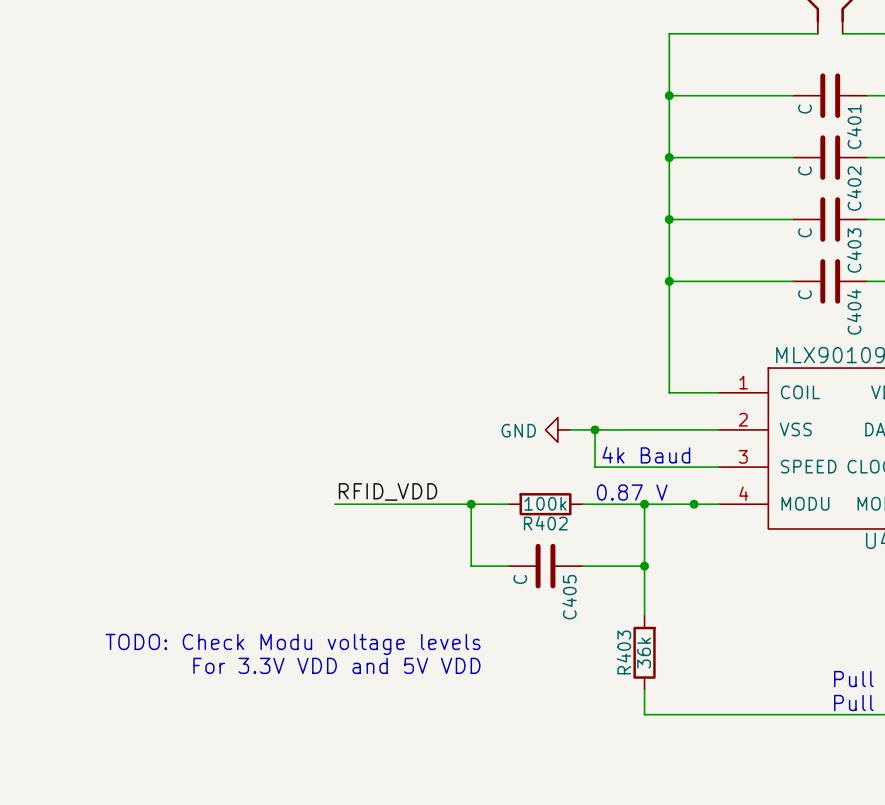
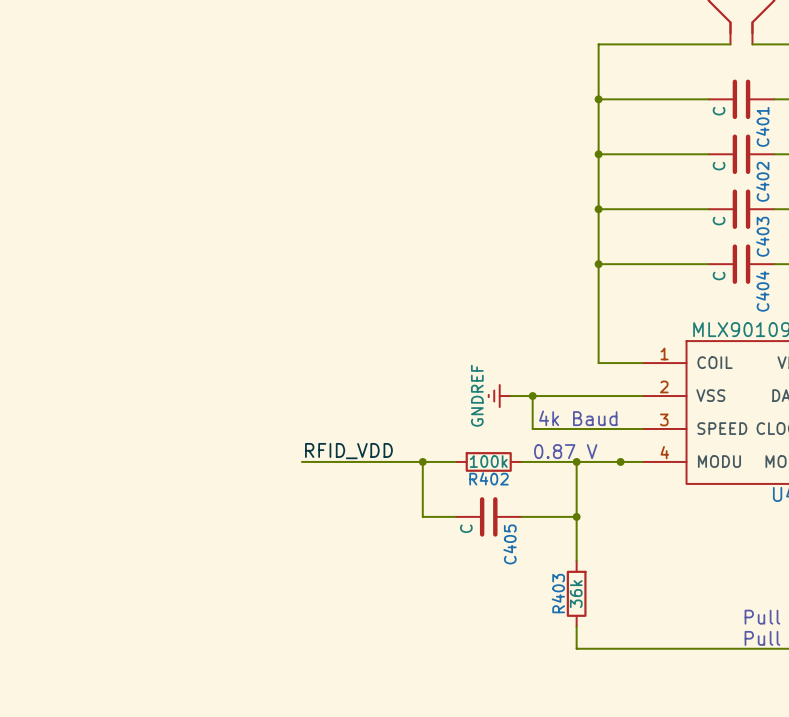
power symbol: GND (557, 429) -> GNDREF (499, 396)
text: TODO: Check Modu voltage levels (293, 644) -> none
text: For 3.3V VDD and 5V VDD (336, 665) -> none

